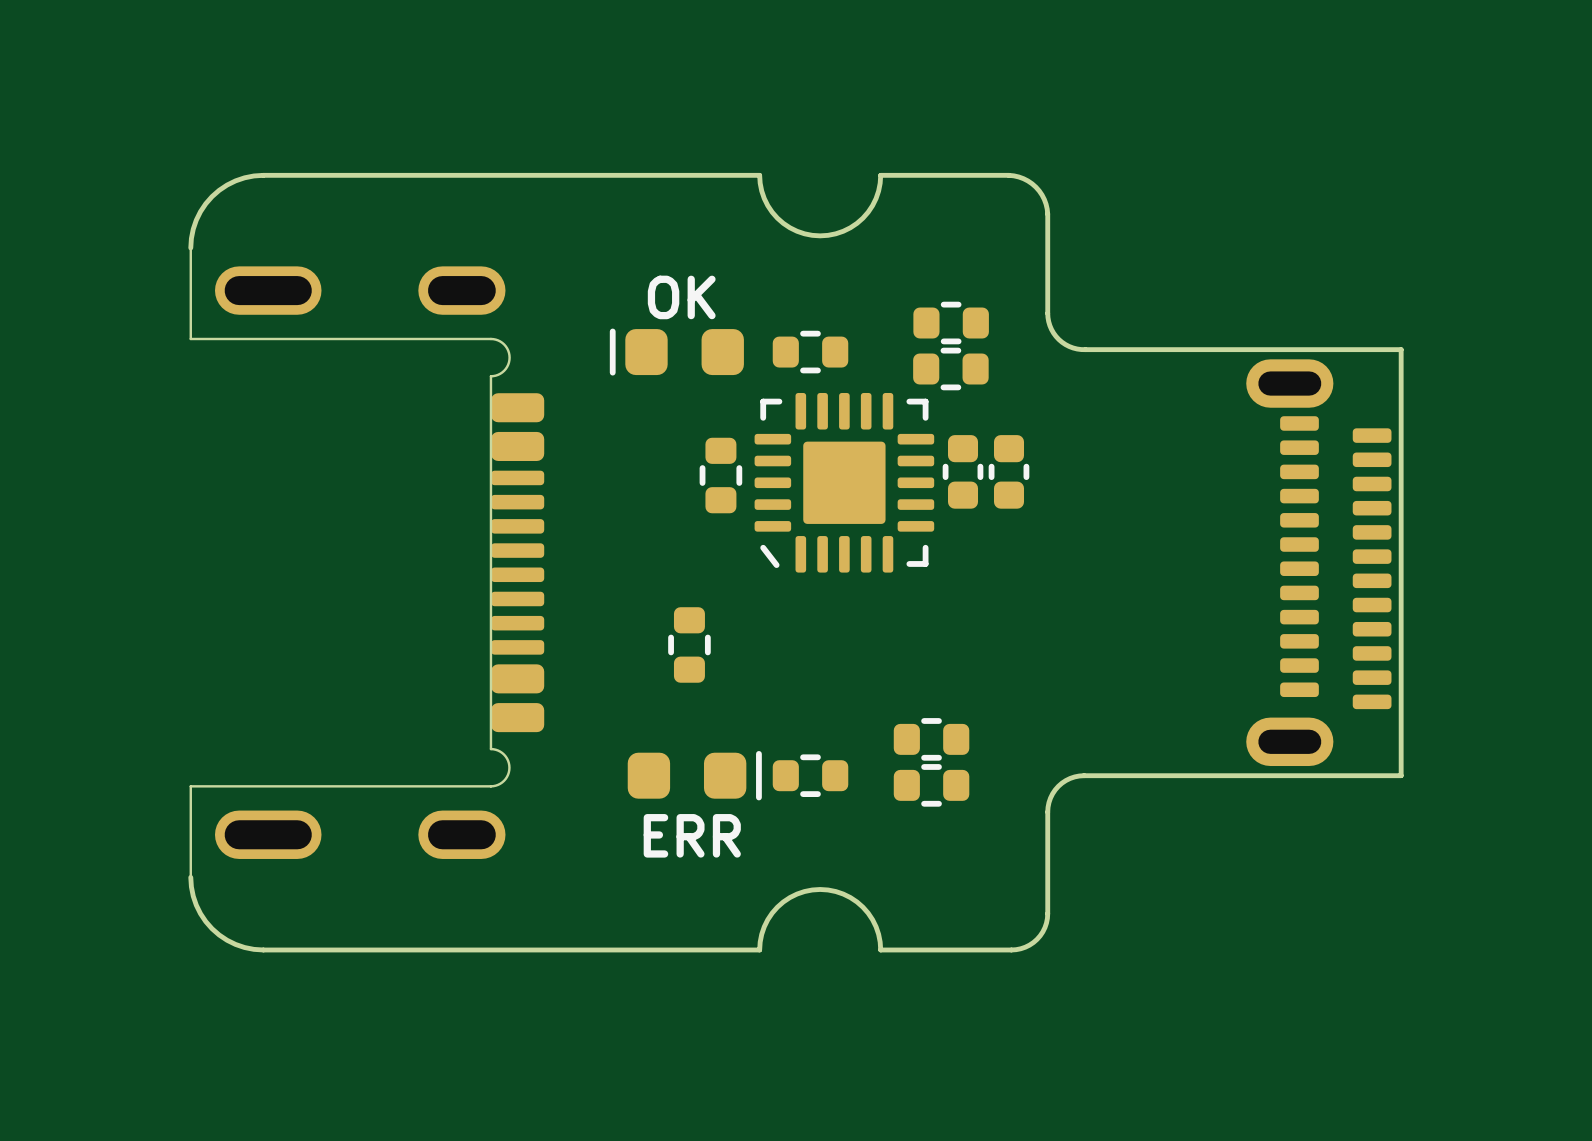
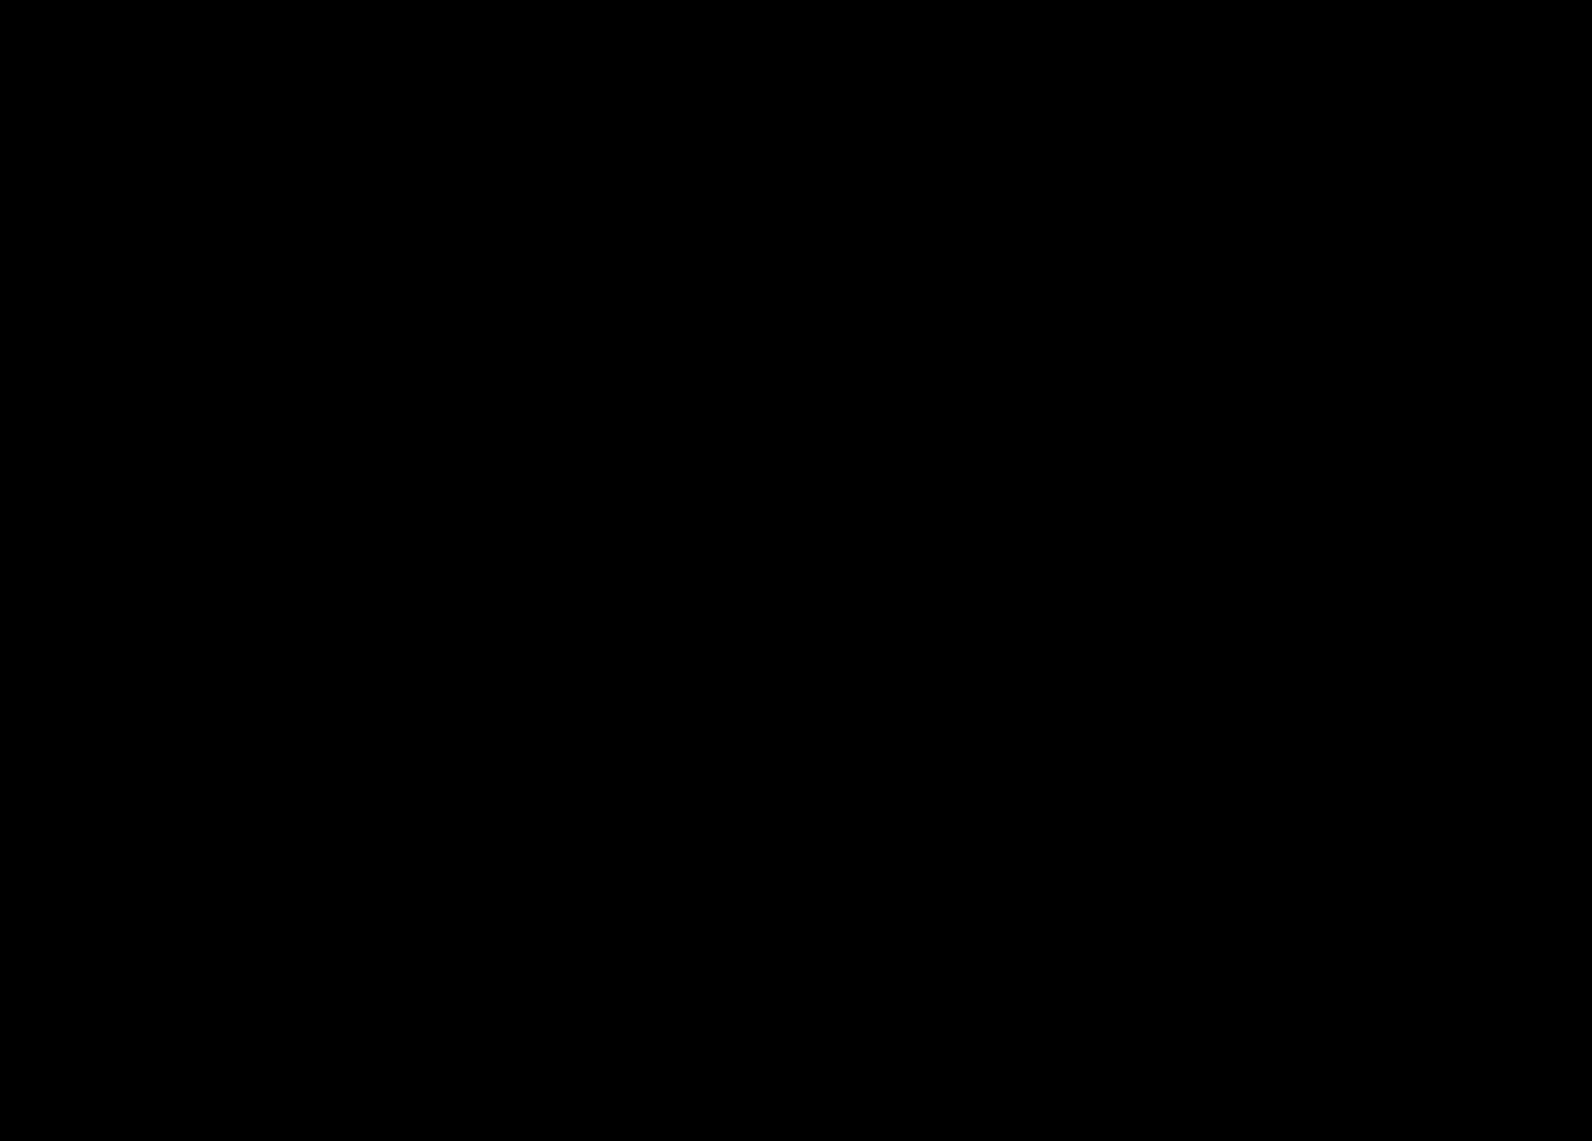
board edge: (190, 247) (196, 220) (205, 203) (227, 185) (253, 175) (759, 175) (764, 198) (777, 218) (797, 231) (820, 235) (843, 231) (862, 218) (876, 198) (880, 175) (1009, 175) (1023, 178) (1032, 183) (1042, 195) (1046, 204) (1047, 317) (1056, 336) (1069, 346) (1085, 349) (1401, 349) (1401, 775) (1084, 775) (1070, 778) (1058, 786) (1048, 802) (1047, 918) (1040, 935) (1025, 947) (1011, 949) (880, 949) (876, 926) (862, 907) (843, 894) (820, 889) (797, 894) (777, 907) (764, 926) (759, 949) (253, 949) (227, 940) (205, 921) (193, 896) (190, 877) -> none
text: OK (681, 297) -> none
part: (951, 323) -> none
part: (676, 352) -> none
part: (810, 352) -> none
part: (950, 369) -> none
part: (963, 471) -> none
part: (1009, 471) -> none
part: (720, 475) -> none
part: (844, 482) -> none
part: (366, 562) -> none
part: (1318, 562) -> none
part: (689, 644) -> none
part: (931, 739) -> none
part: (694, 775) -> none
part: (810, 775) -> none
part: (931, 785) -> none
text: ERR (692, 835) -> none

